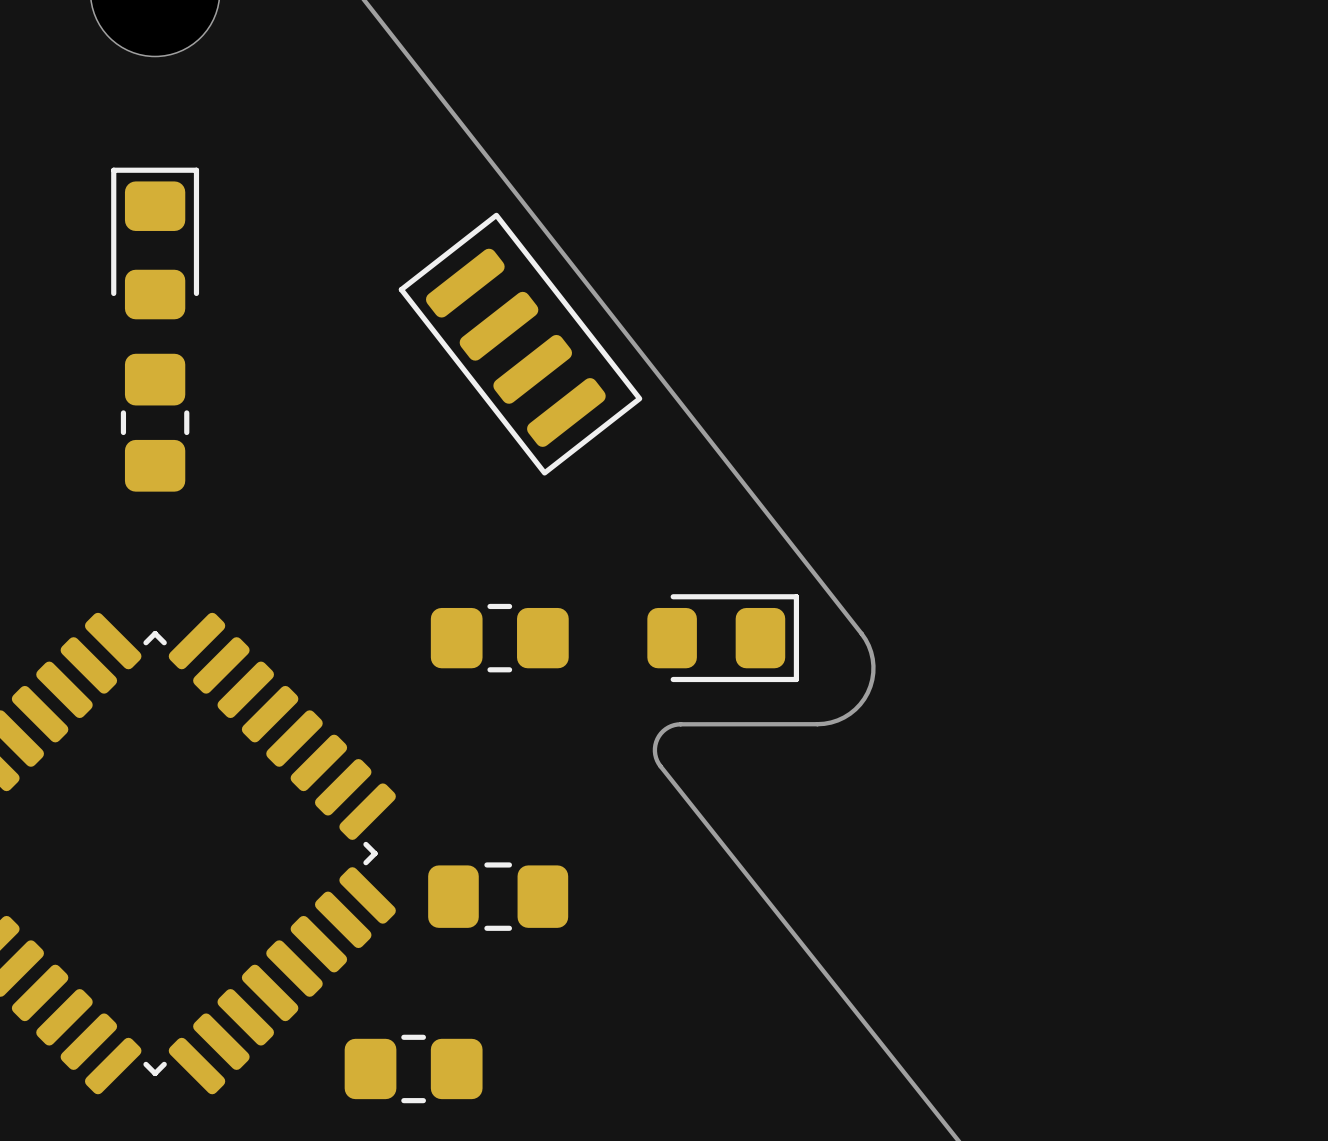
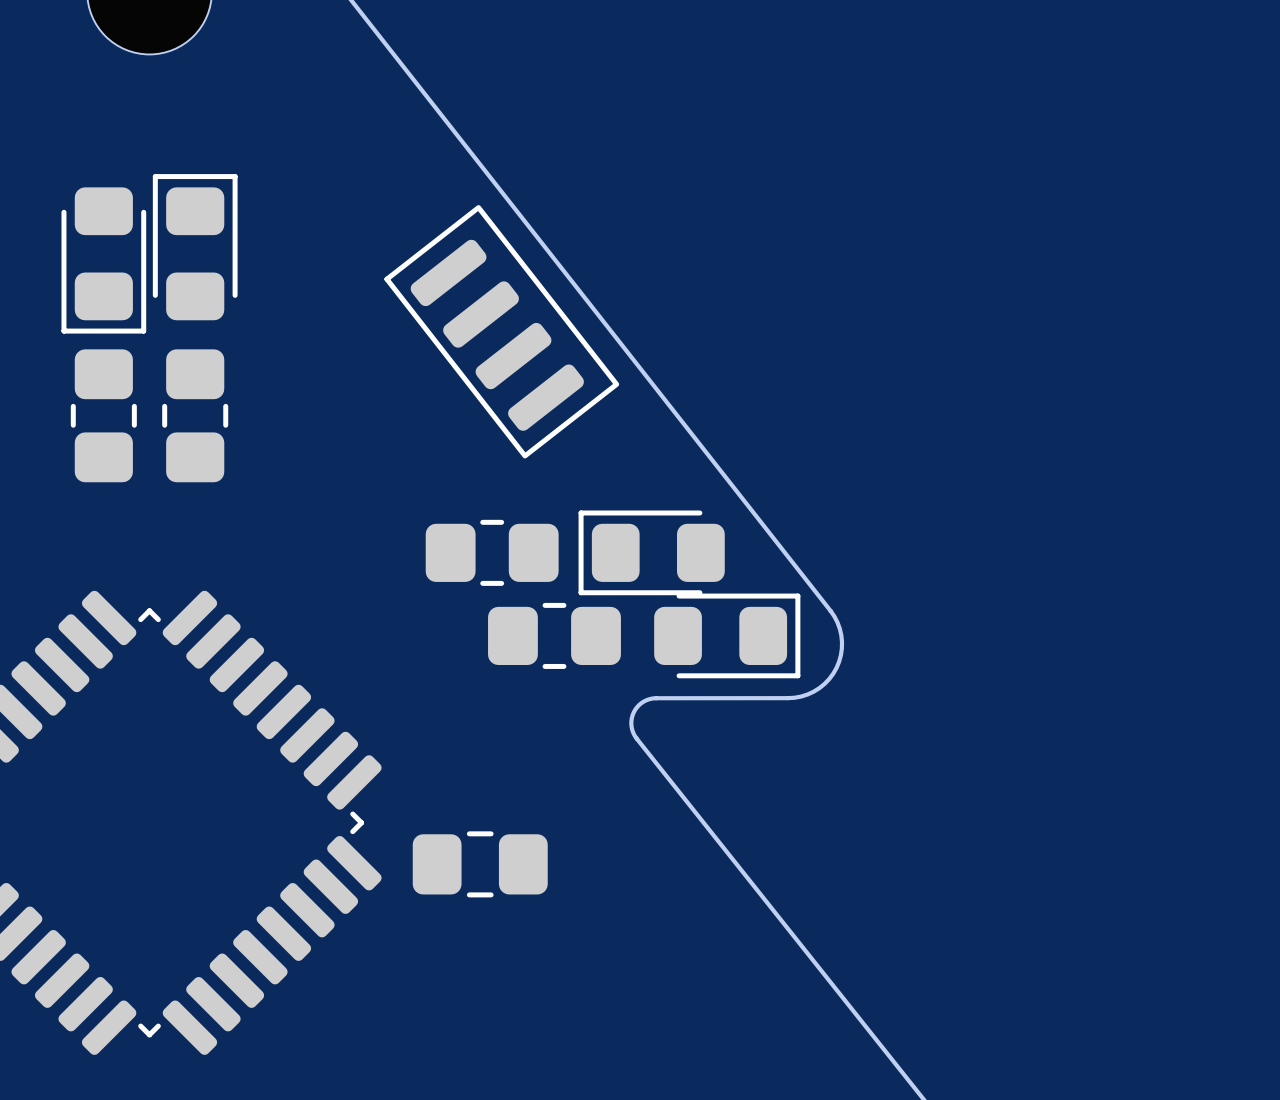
part: (155, 243) -> none
part: none -> (195, 247)
part: none -> (103, 260)
part: (155, 422) -> none
part: none -> (103, 415)
part: none -> (195, 415)
part: none -> (492, 552)
part: none -> (651, 552)
part: (499, 638) -> none
part position: (723, 638) -> (727, 635)
part: none -> (554, 635)
part: (413, 1068) -> none

